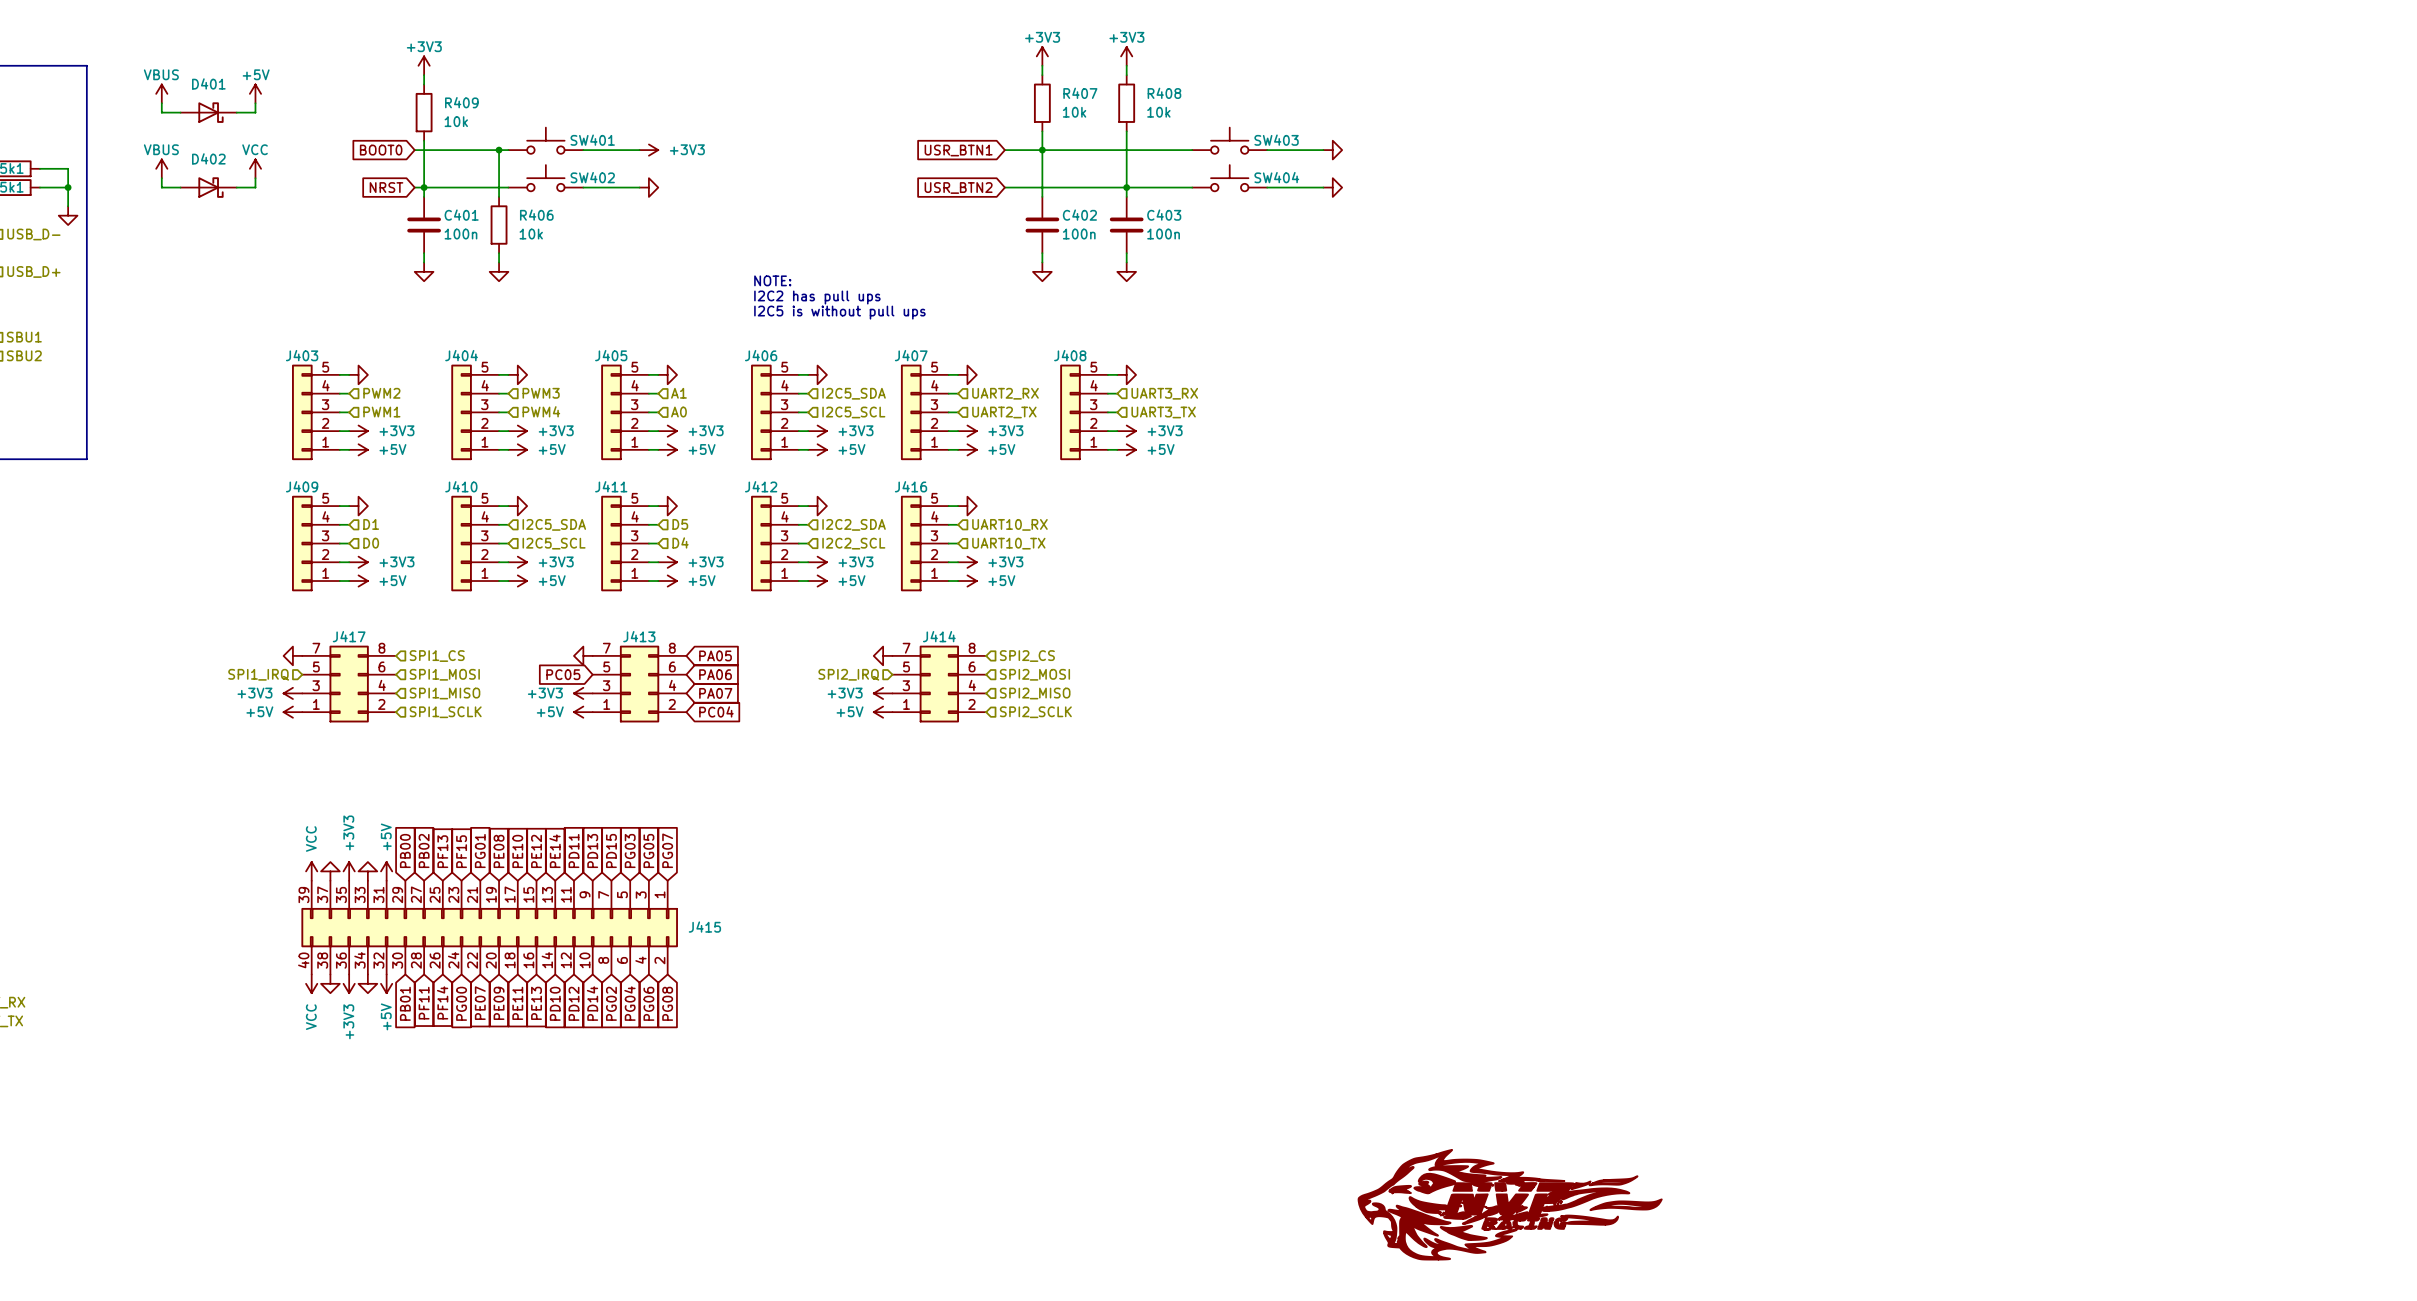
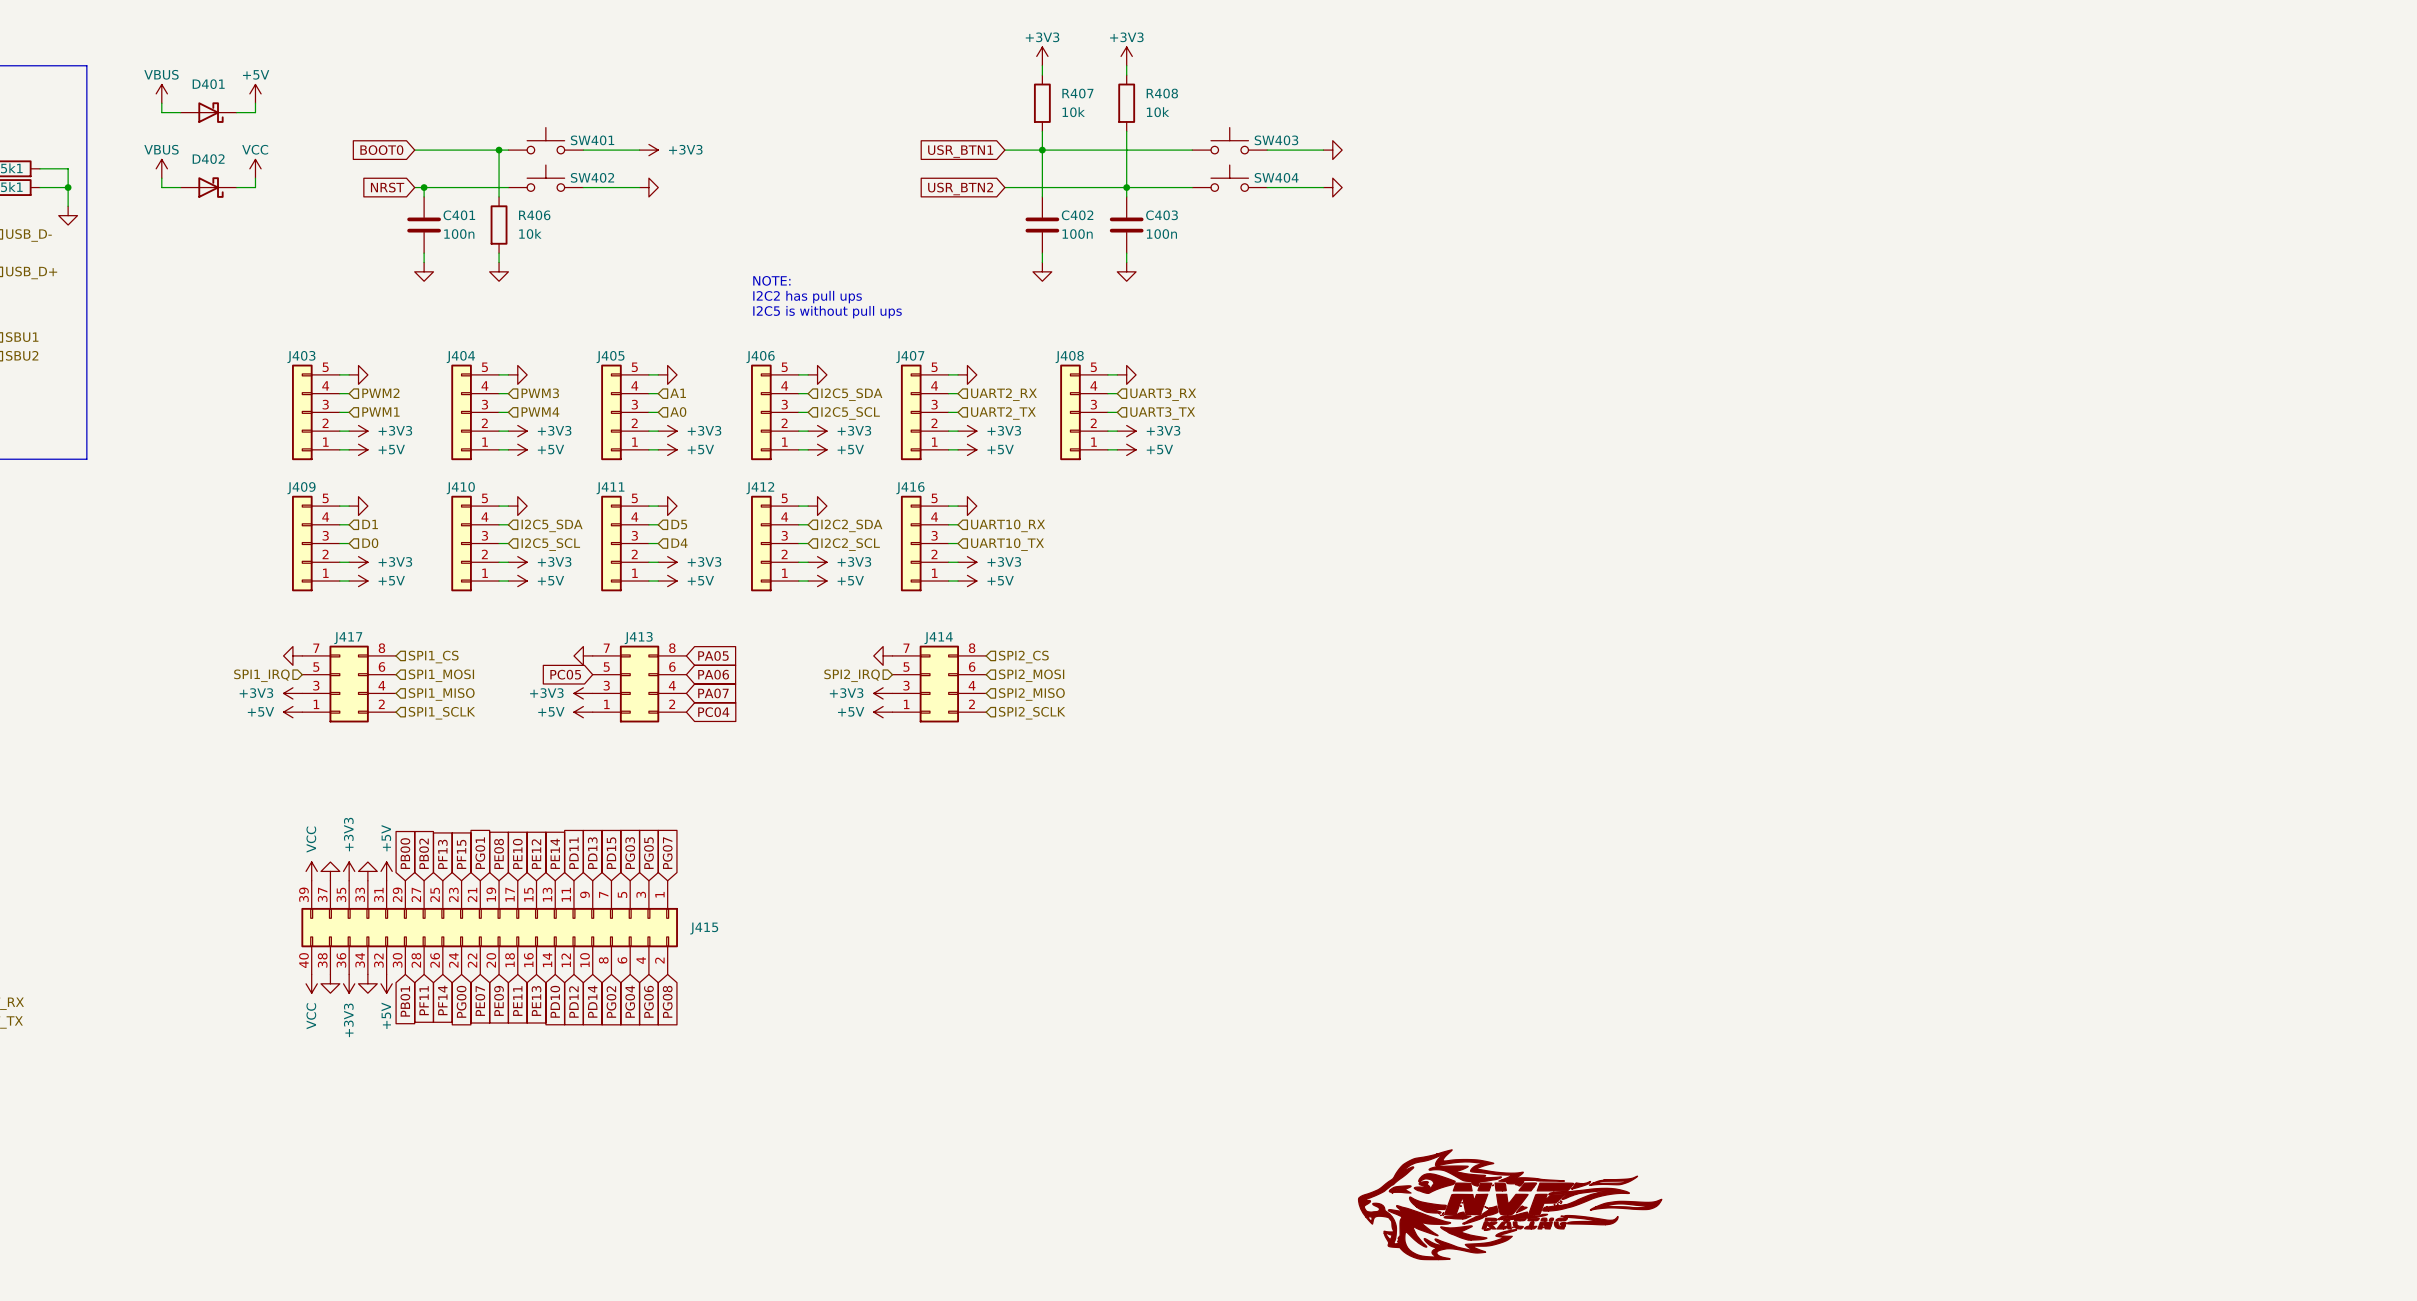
power symbol: +3V3 (424, 65) -> none
wire: (424, 75) (424, 84) -> none
R409: 10k (424, 112) -> none
wire: (424, 140) (424, 187) -> none

